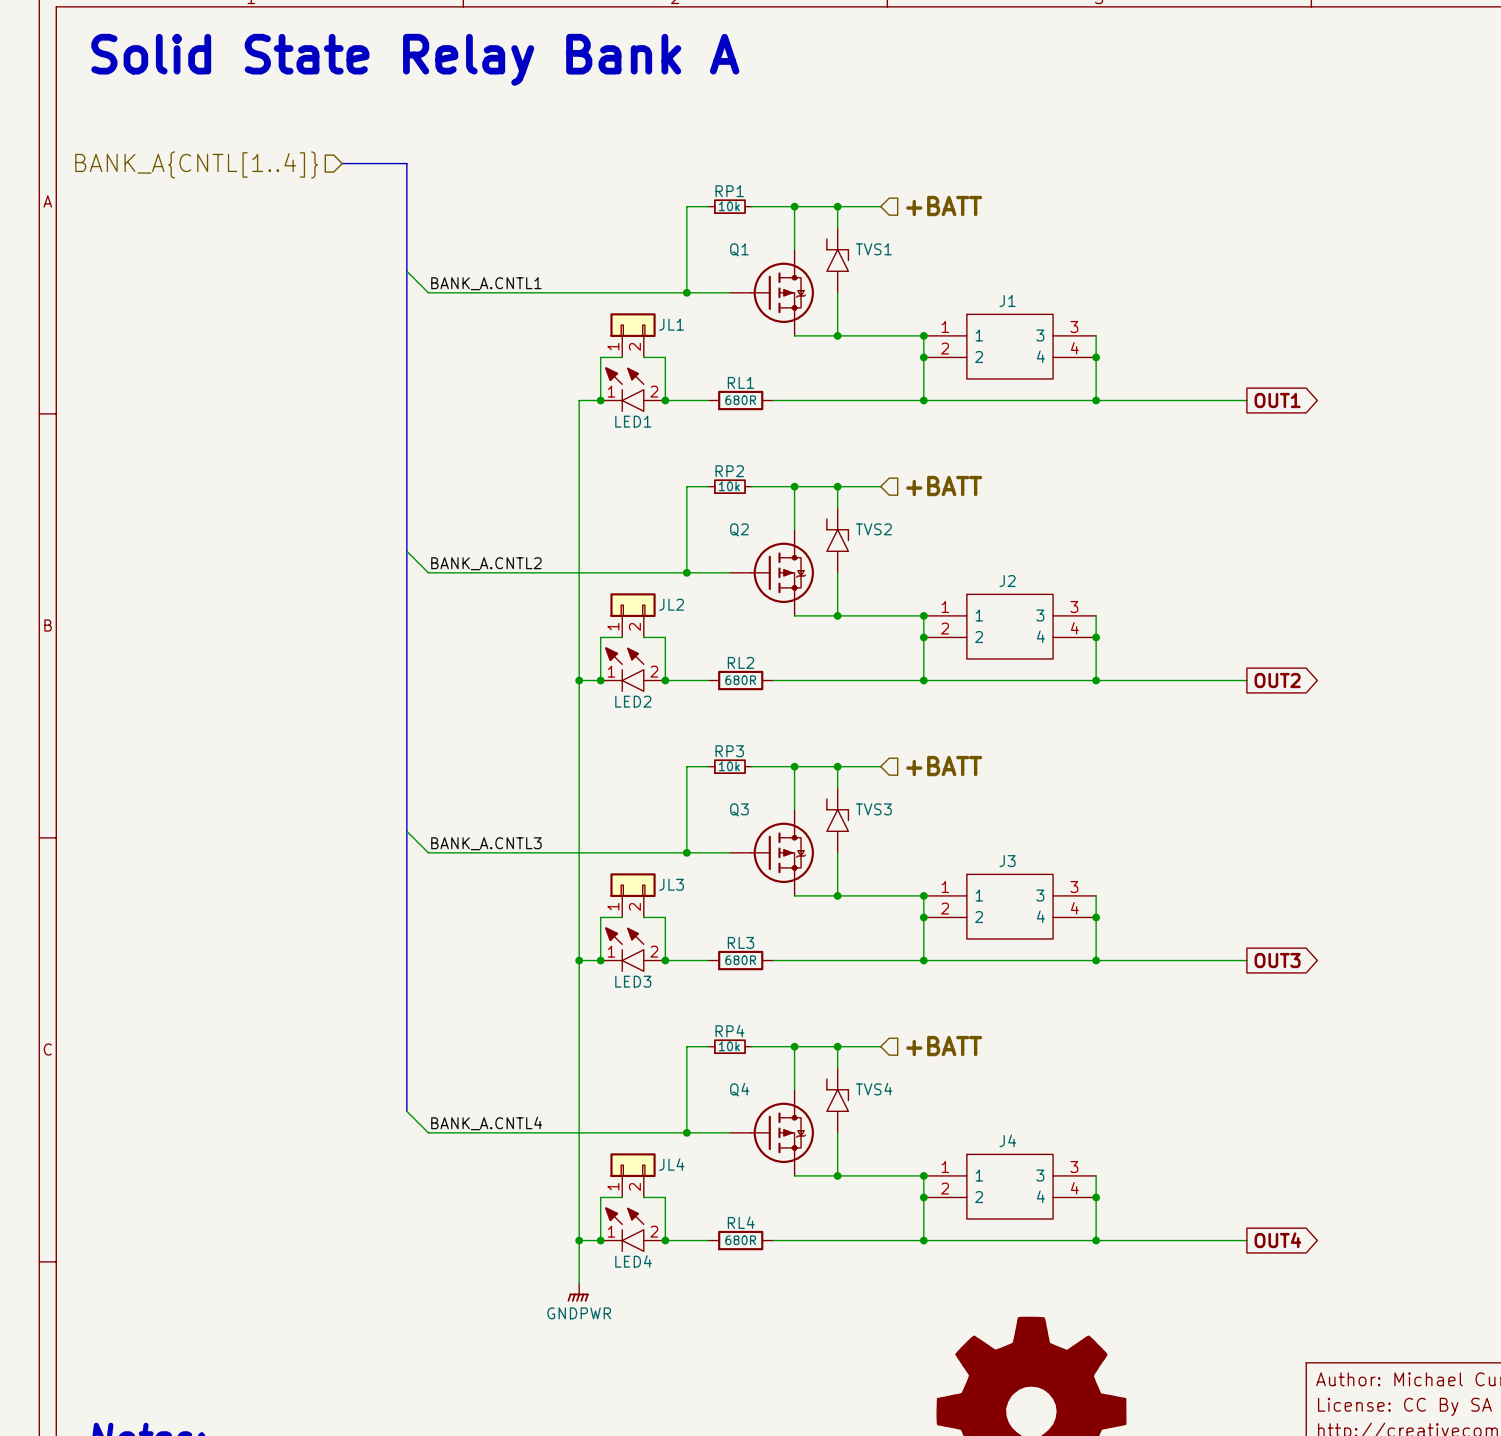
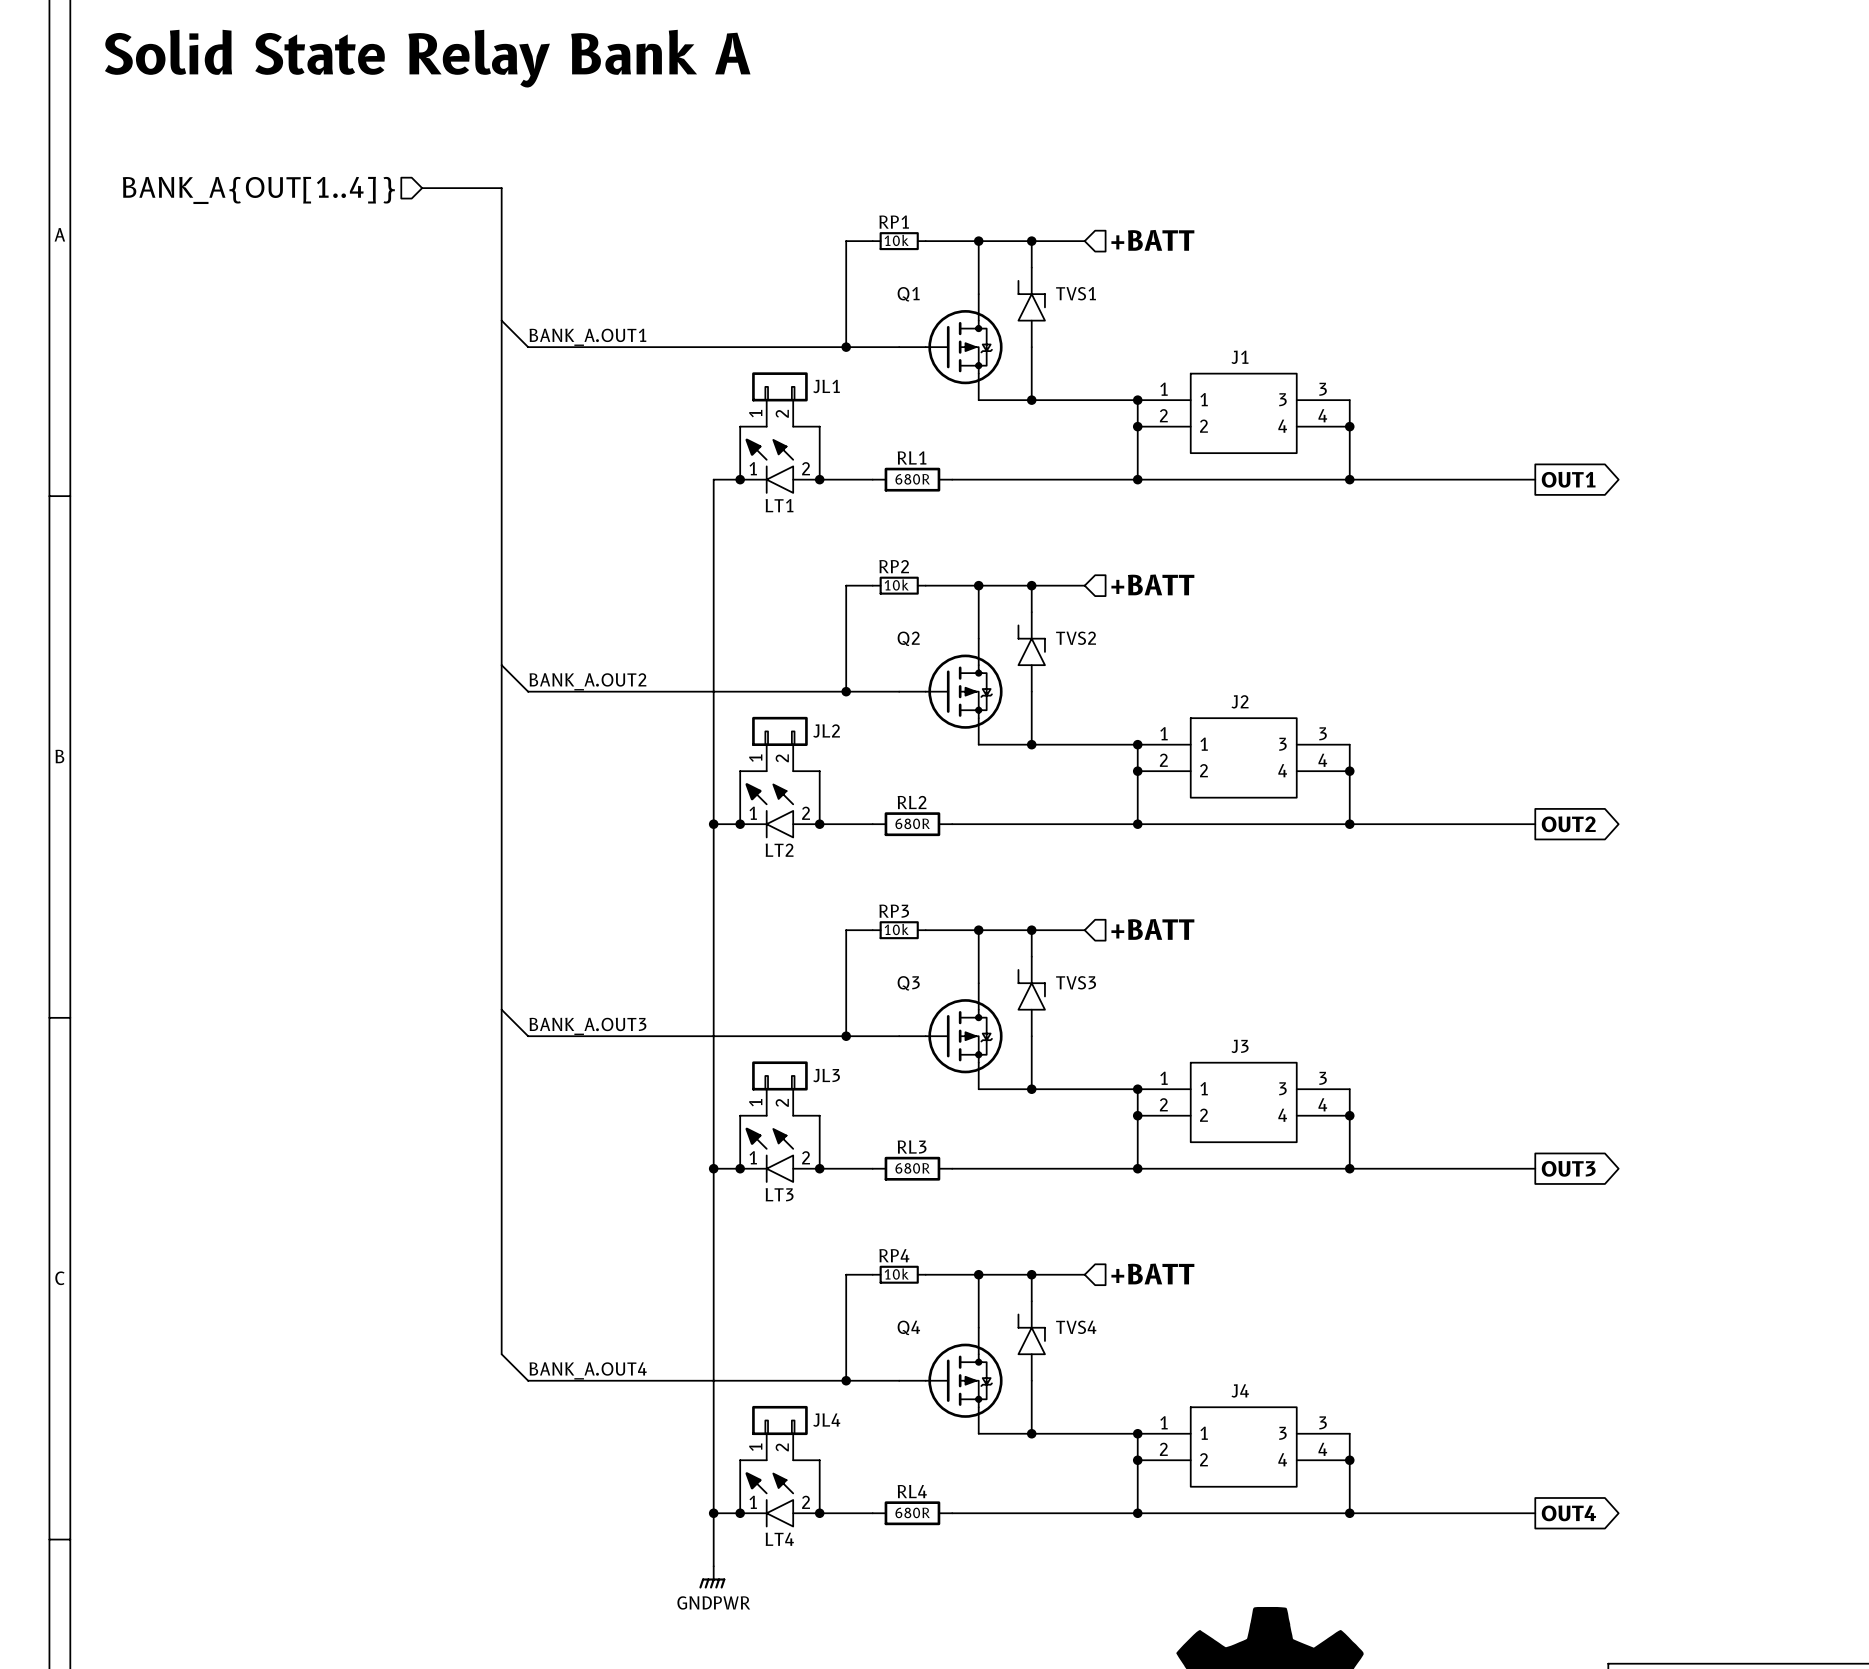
hierarchical label: BANK_A{CNTL[1..4]} (196, 164) -> BANK_A{OUT[1..4]} (258, 190)
label: BANK_A.CNTL1 (486, 283) -> BANK_A.OUT1 (587, 337)
LED1 name: LED1 (633, 421) -> LT1 (779, 505)
label: BANK_A.CNTL2 (486, 563) -> BANK_A.OUT2 (587, 681)
LED2 name: LED2 (633, 701) -> LT2 (779, 850)
label: BANK_A.CNTL3 (486, 843) -> BANK_A.OUT3 (587, 1026)
LED3 name: LED3 (633, 981) -> LT3 (779, 1194)
label: BANK_A.CNTL4 (486, 1123) -> BANK_A.OUT4 (588, 1370)
LED4 name: LED4 (633, 1261) -> LT4 (779, 1539)

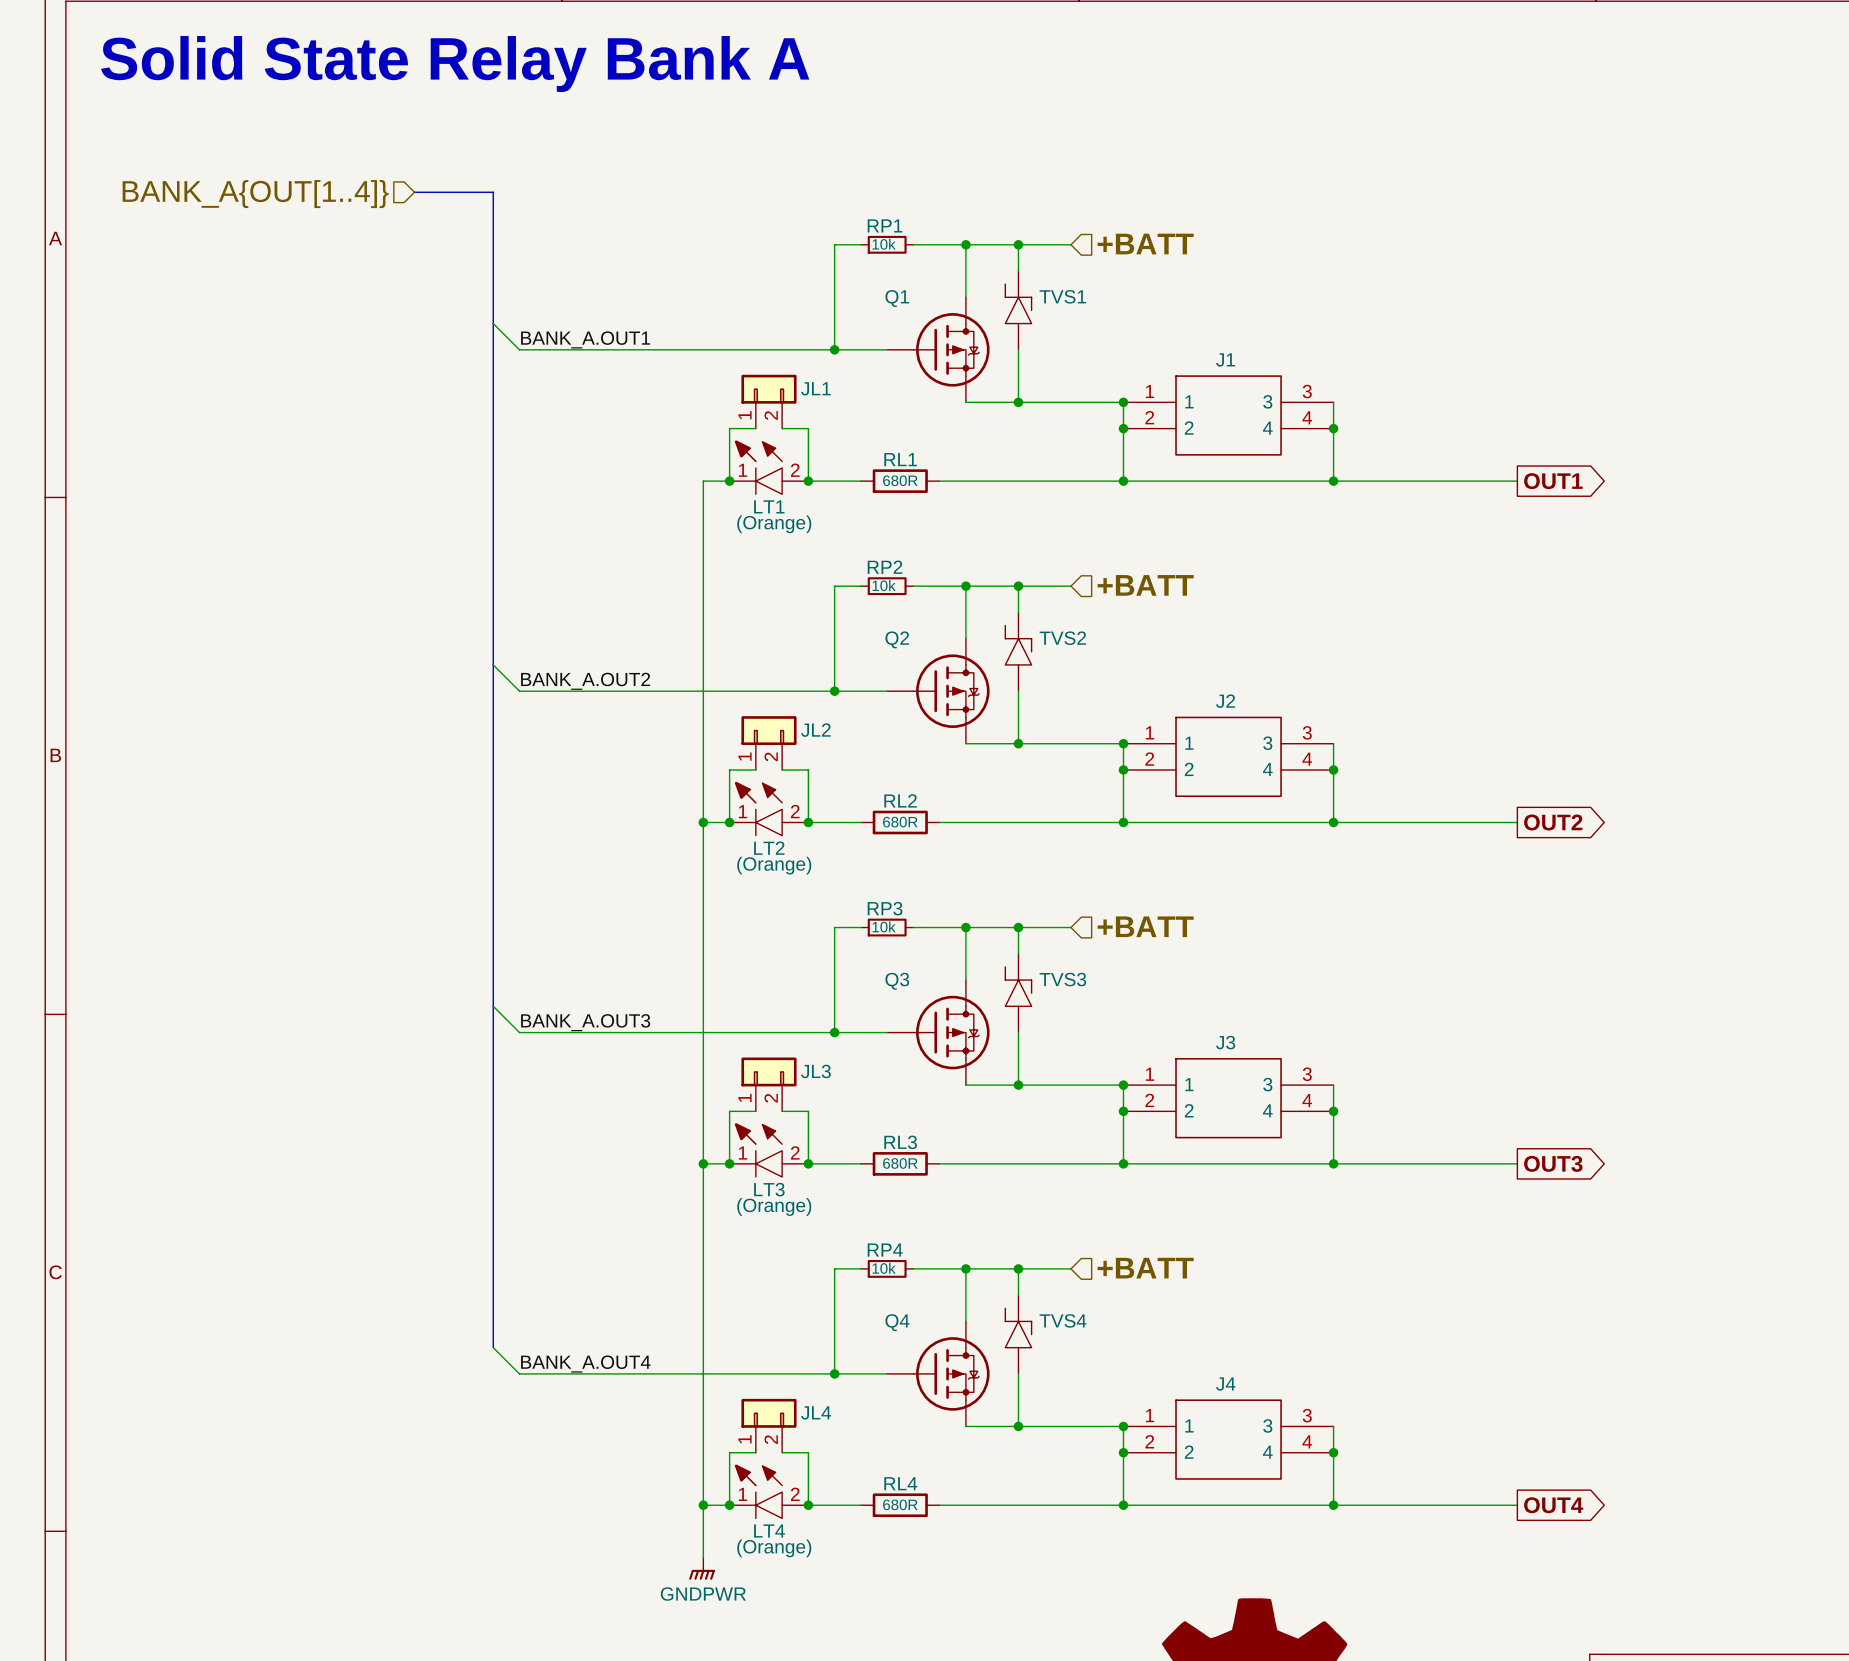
LT1 text: none -> (Orange) (774, 524)
LT2 text: none -> (Orange) (774, 865)
LT3 text: none -> (Orange) (774, 1207)
LT4 text: none -> (Orange) (774, 1548)

